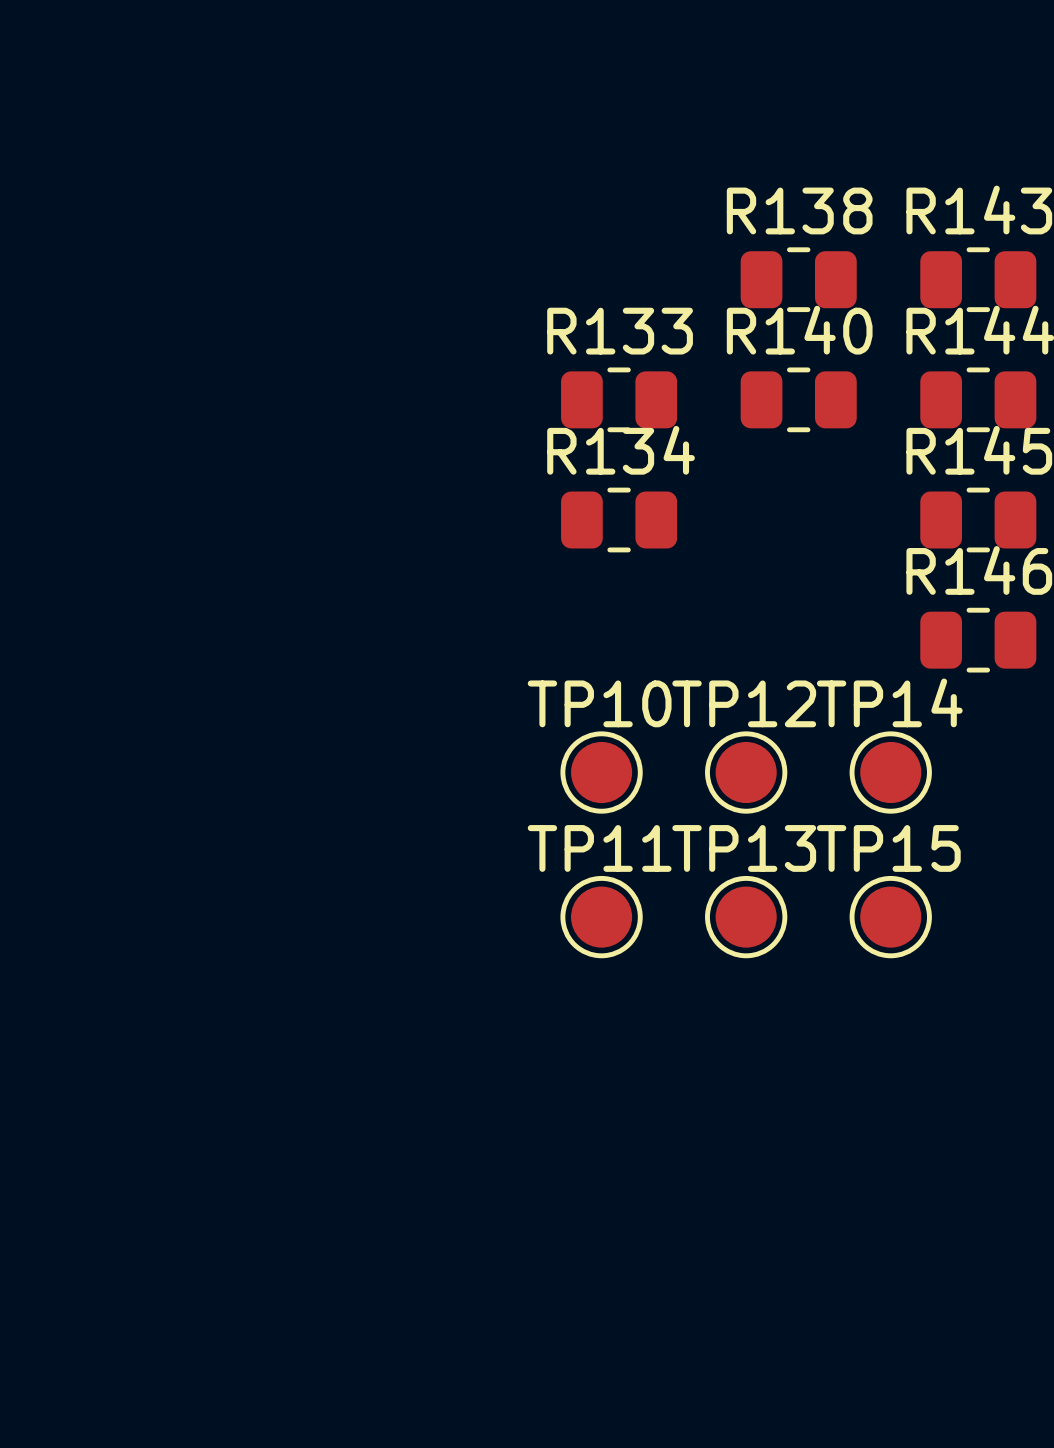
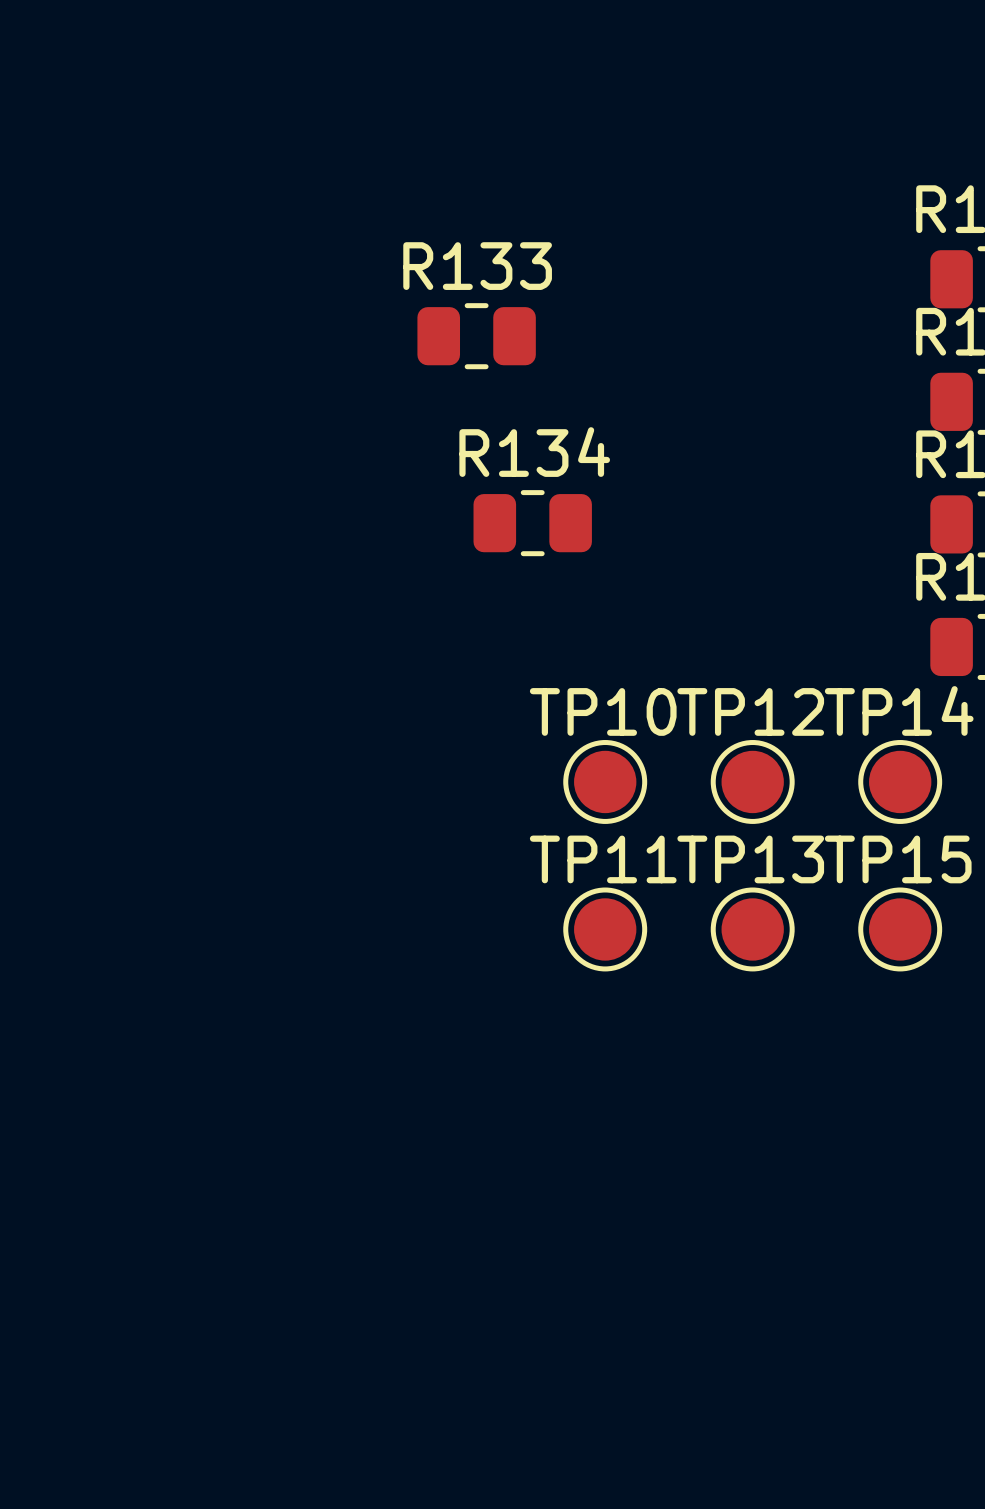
R138: (798, 279) -> none
R133 position: (619, 399) -> (476, 336)
R140: (798, 399) -> none
R134 position: (619, 520) -> (532, 523)

